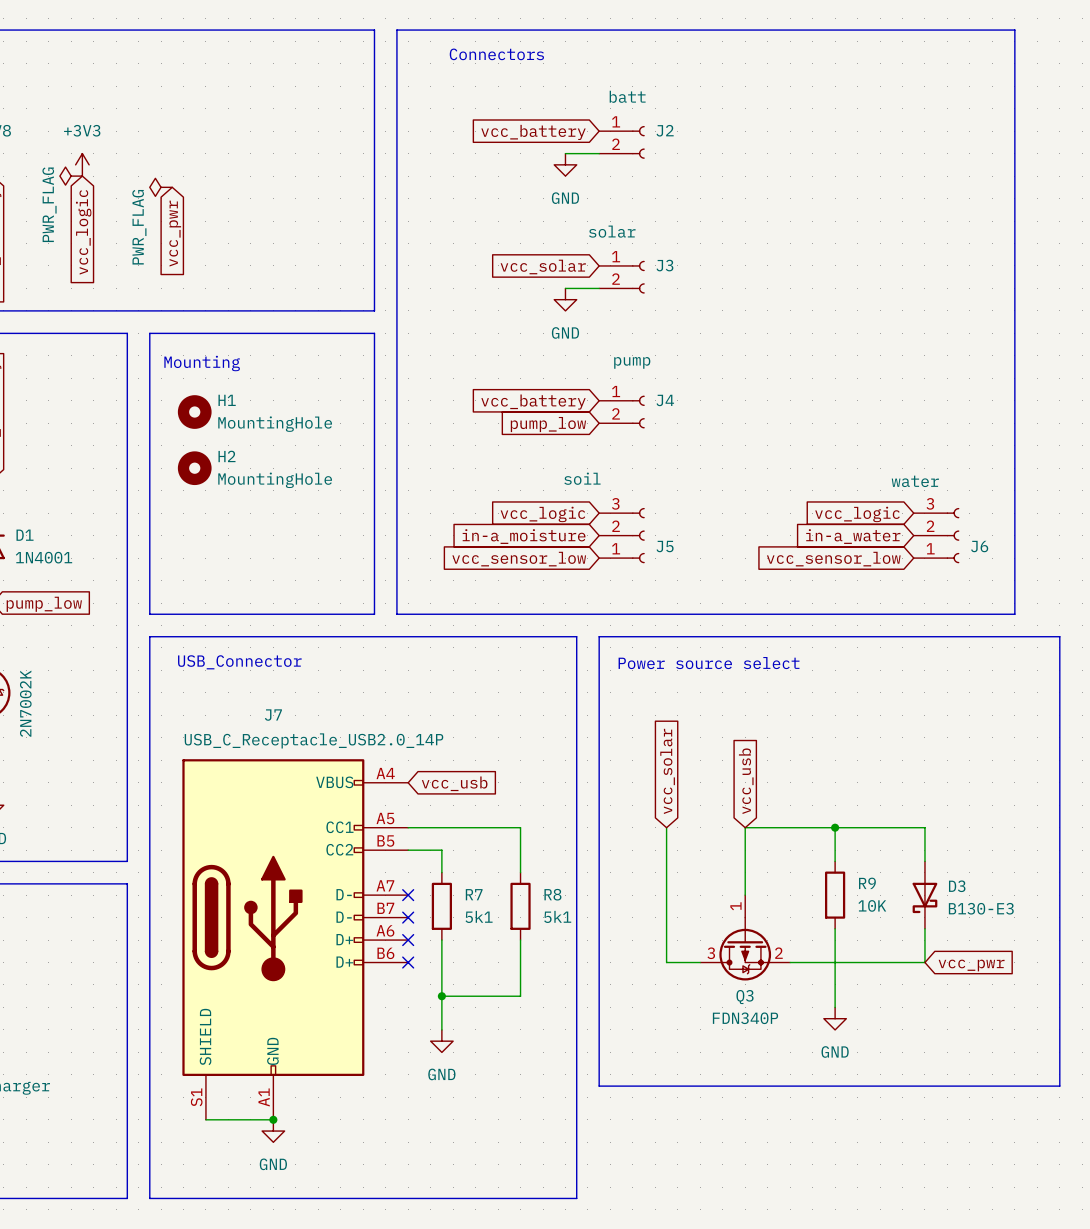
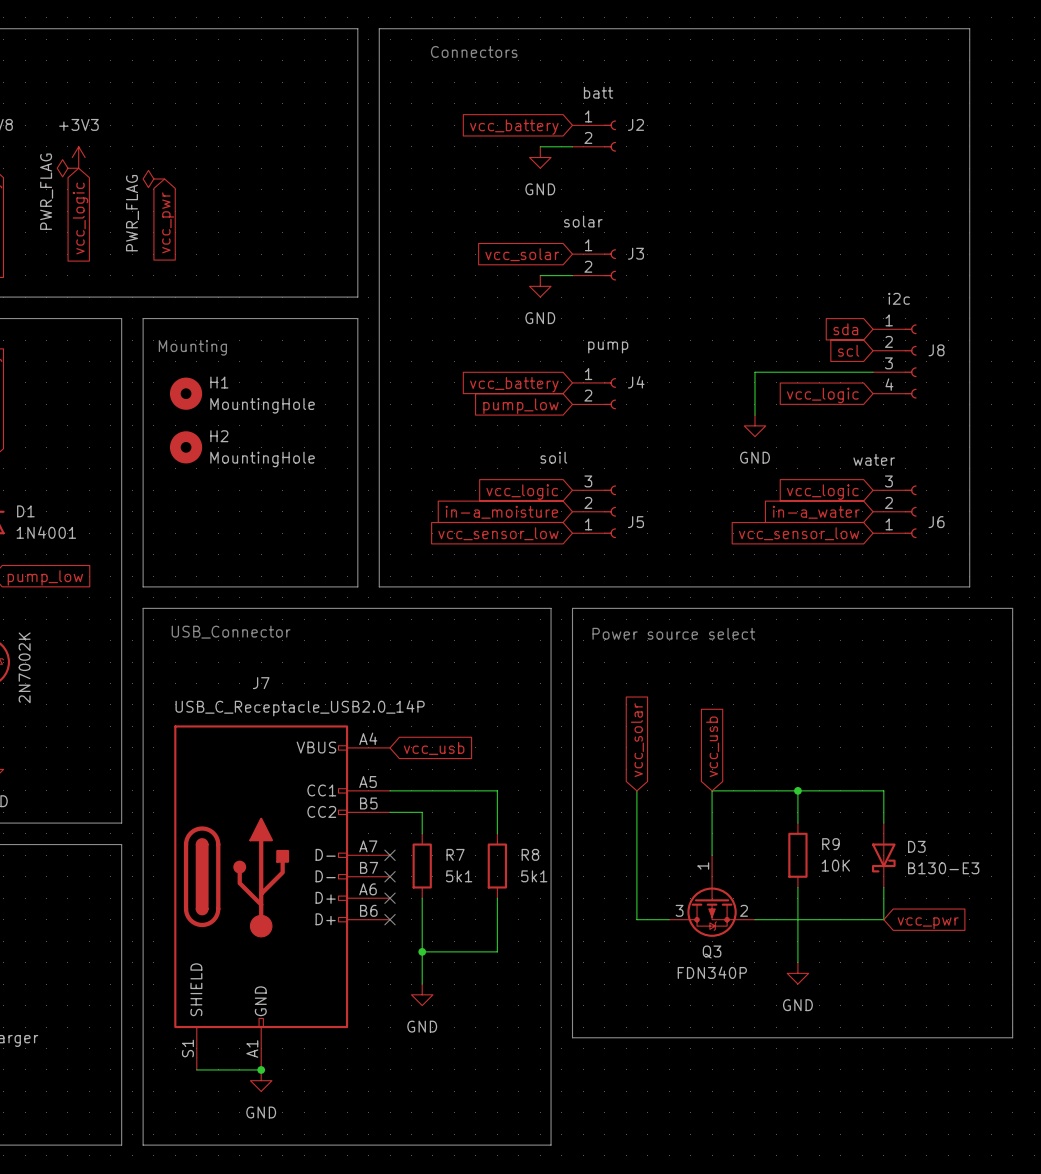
global label: none -> sda (845, 329)
global label: none -> scl (848, 350)
J8: none -> i2c (894, 361)
wire: none -> (873, 372) (754, 372) (754, 415)
global label: none -> vcc_logic (822, 395)
power symbol: none -> GND (754, 425)

